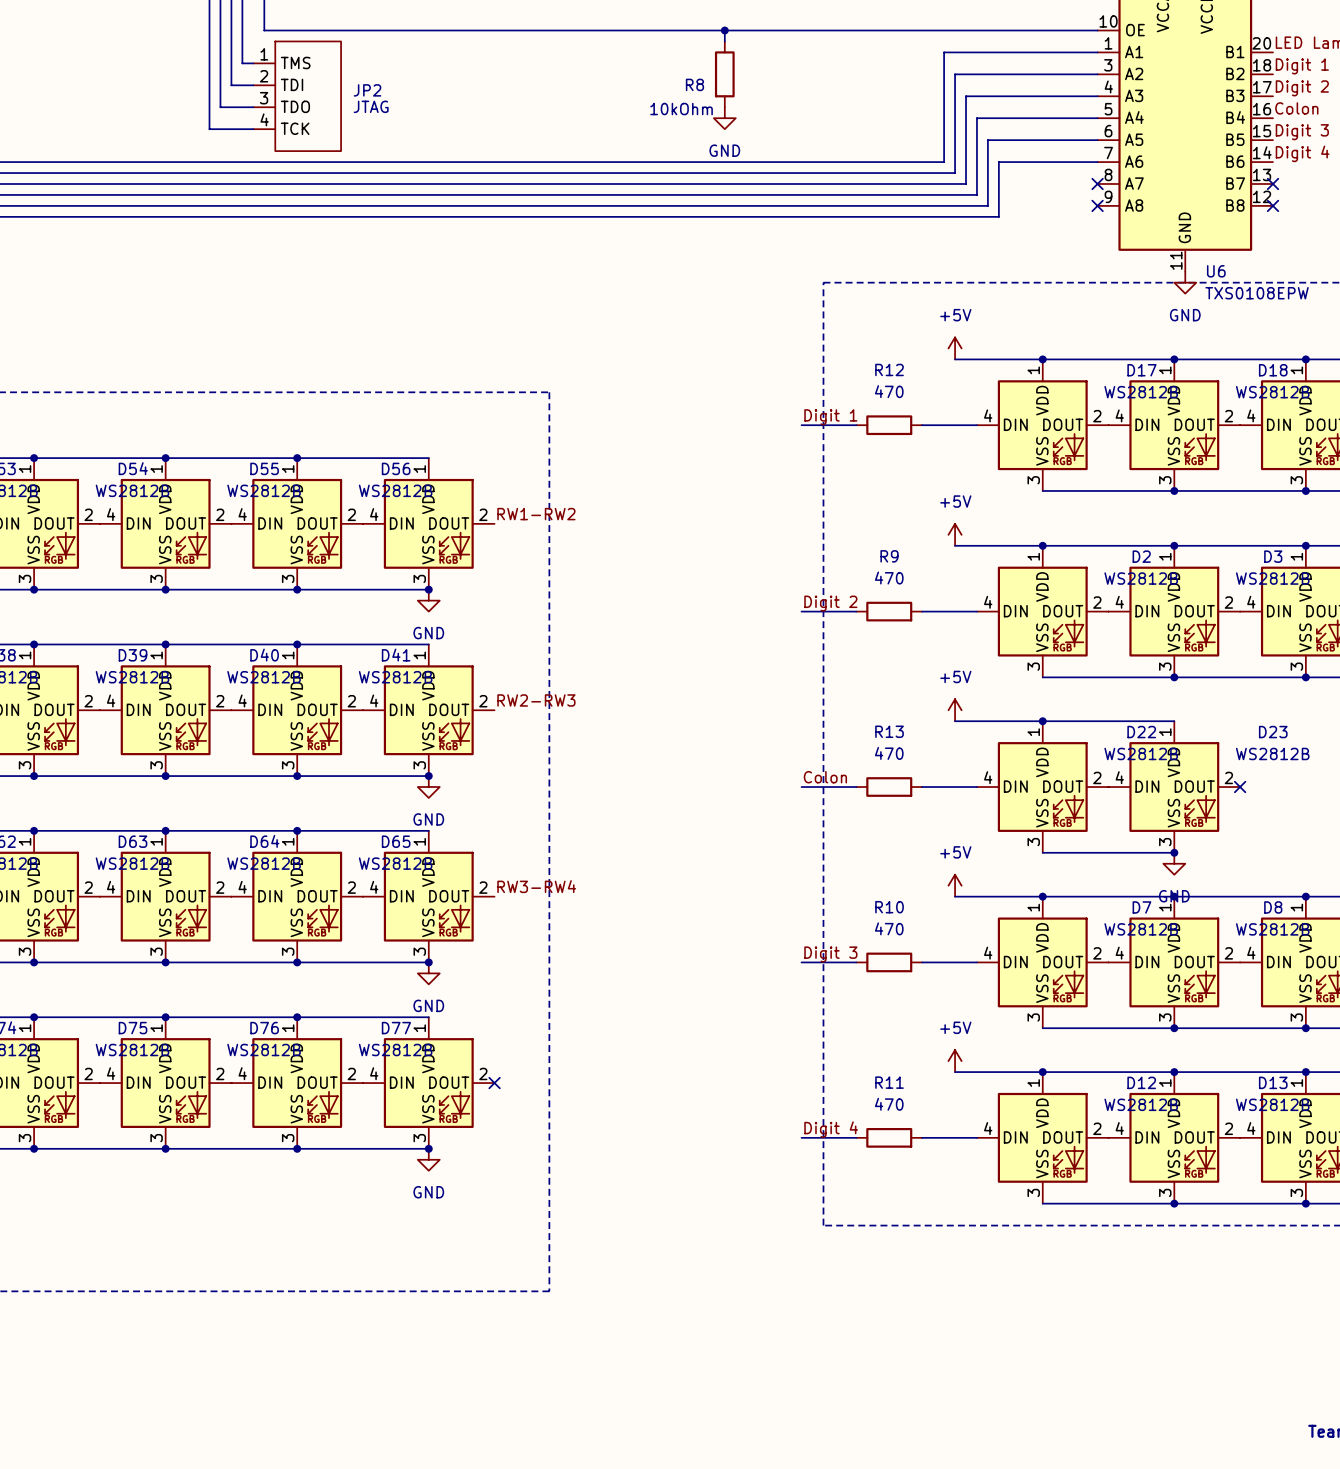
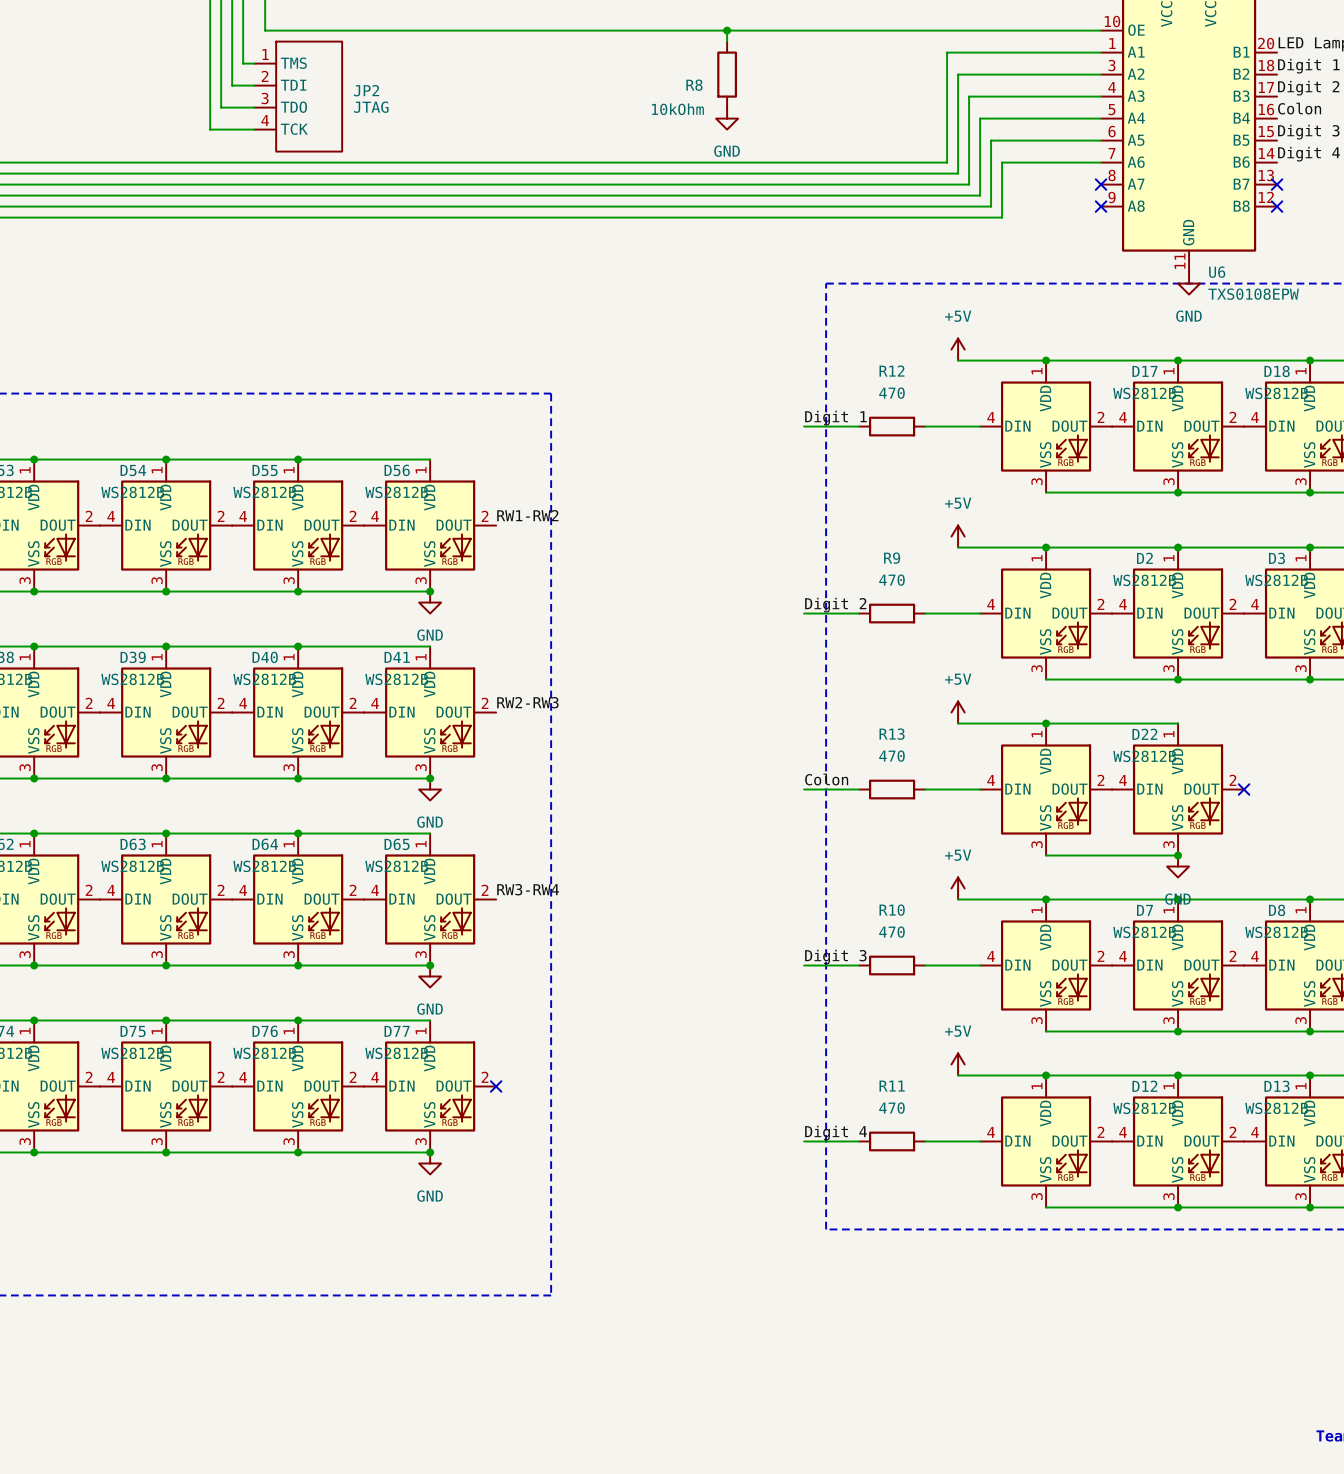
D23 name: D23 (1273, 732) -> none
D23 value: WS2812B (1272, 753) -> none

